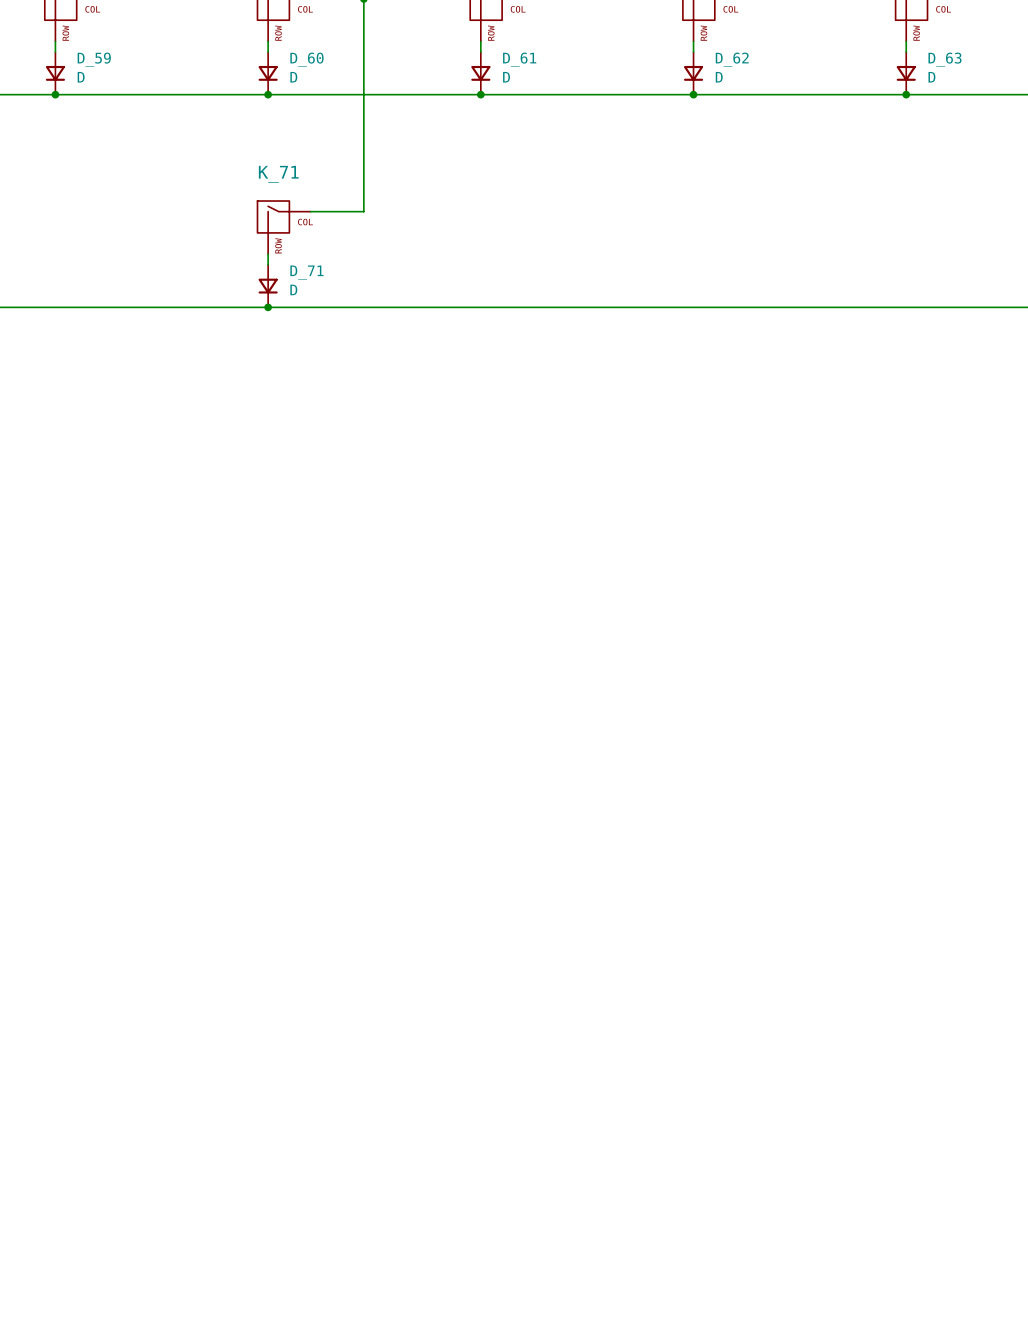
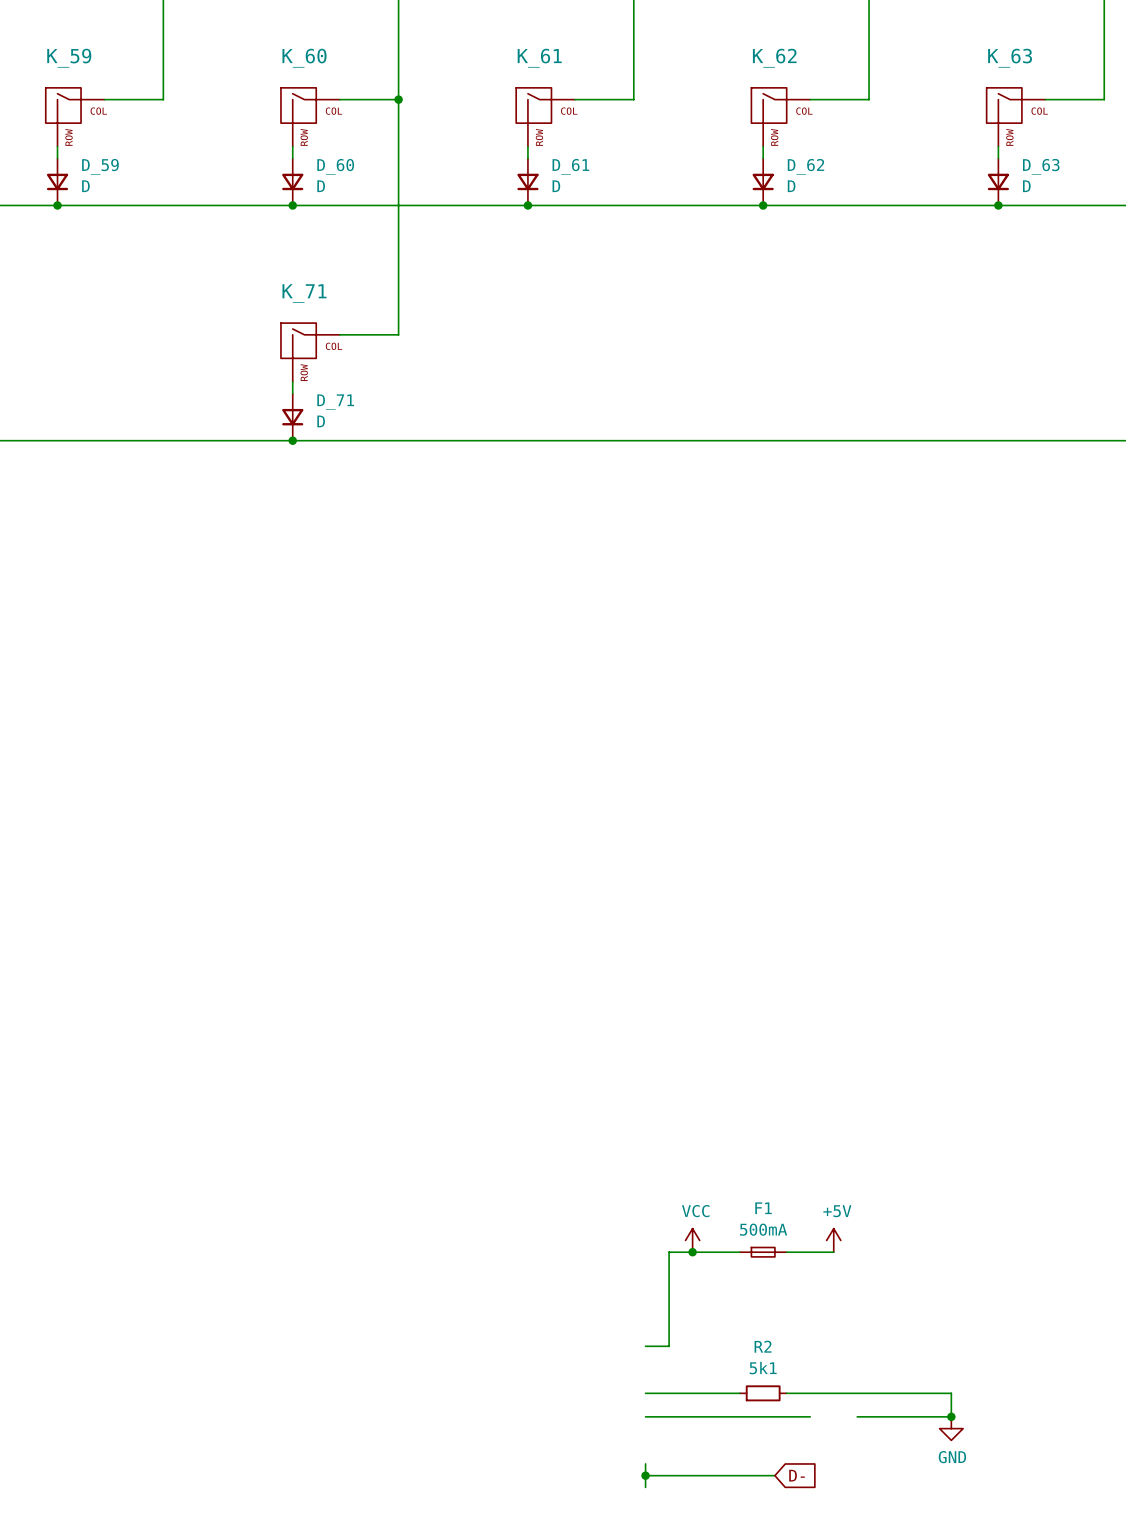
power symbol: none -> VCC (692, 1240)
power symbol: none -> +5V (833, 1240)
junction: none -> (692, 1252)
wire: none -> (739, 1252) (669, 1252) (669, 1346) (645, 1346)
F1: none -> 500mA (763, 1252)
wire: none -> (786, 1252) (833, 1252)
wire: none -> (645, 1393) (739, 1393)
R2: none -> 5k1 (763, 1393)
wire: none -> (786, 1393) (951, 1393) (951, 1416) (857, 1416)
wire: none -> (645, 1416) (810, 1416)
junction: none -> (951, 1416)
power symbol: none -> GND (951, 1428)
wire: none -> (645, 1463) (645, 1487)
wire: none -> (645, 1475) (774, 1475)
junction: none -> (645, 1475)
global label: none -> D- (797, 1475)

